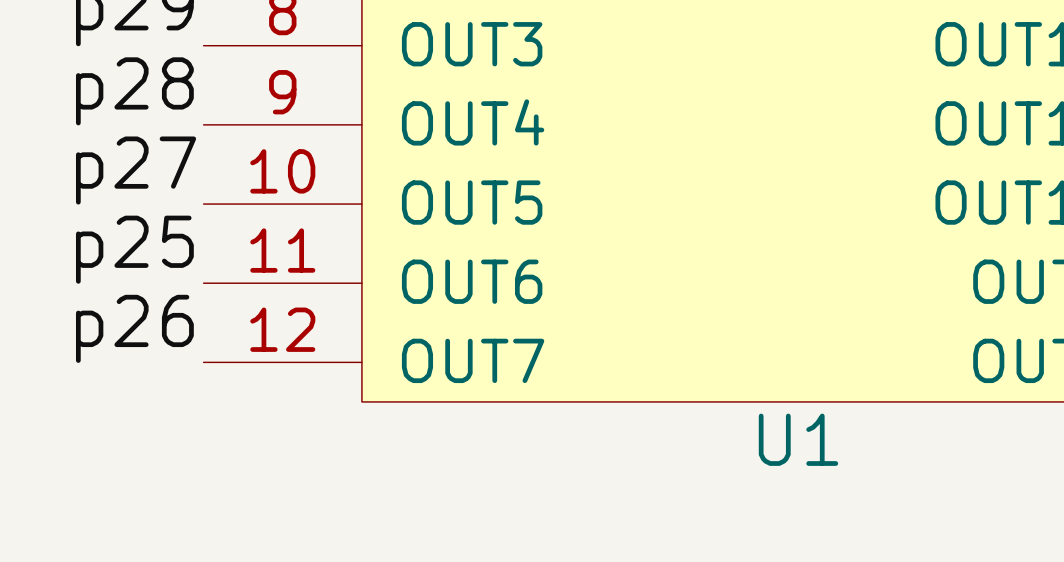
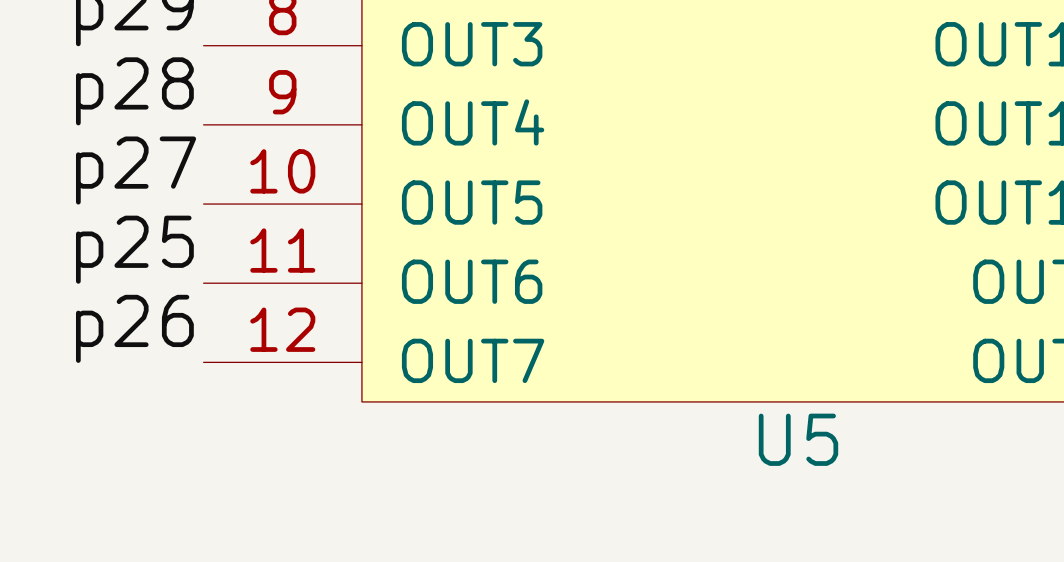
U1 name: U1 (798, 439) -> U5 (798, 439)

